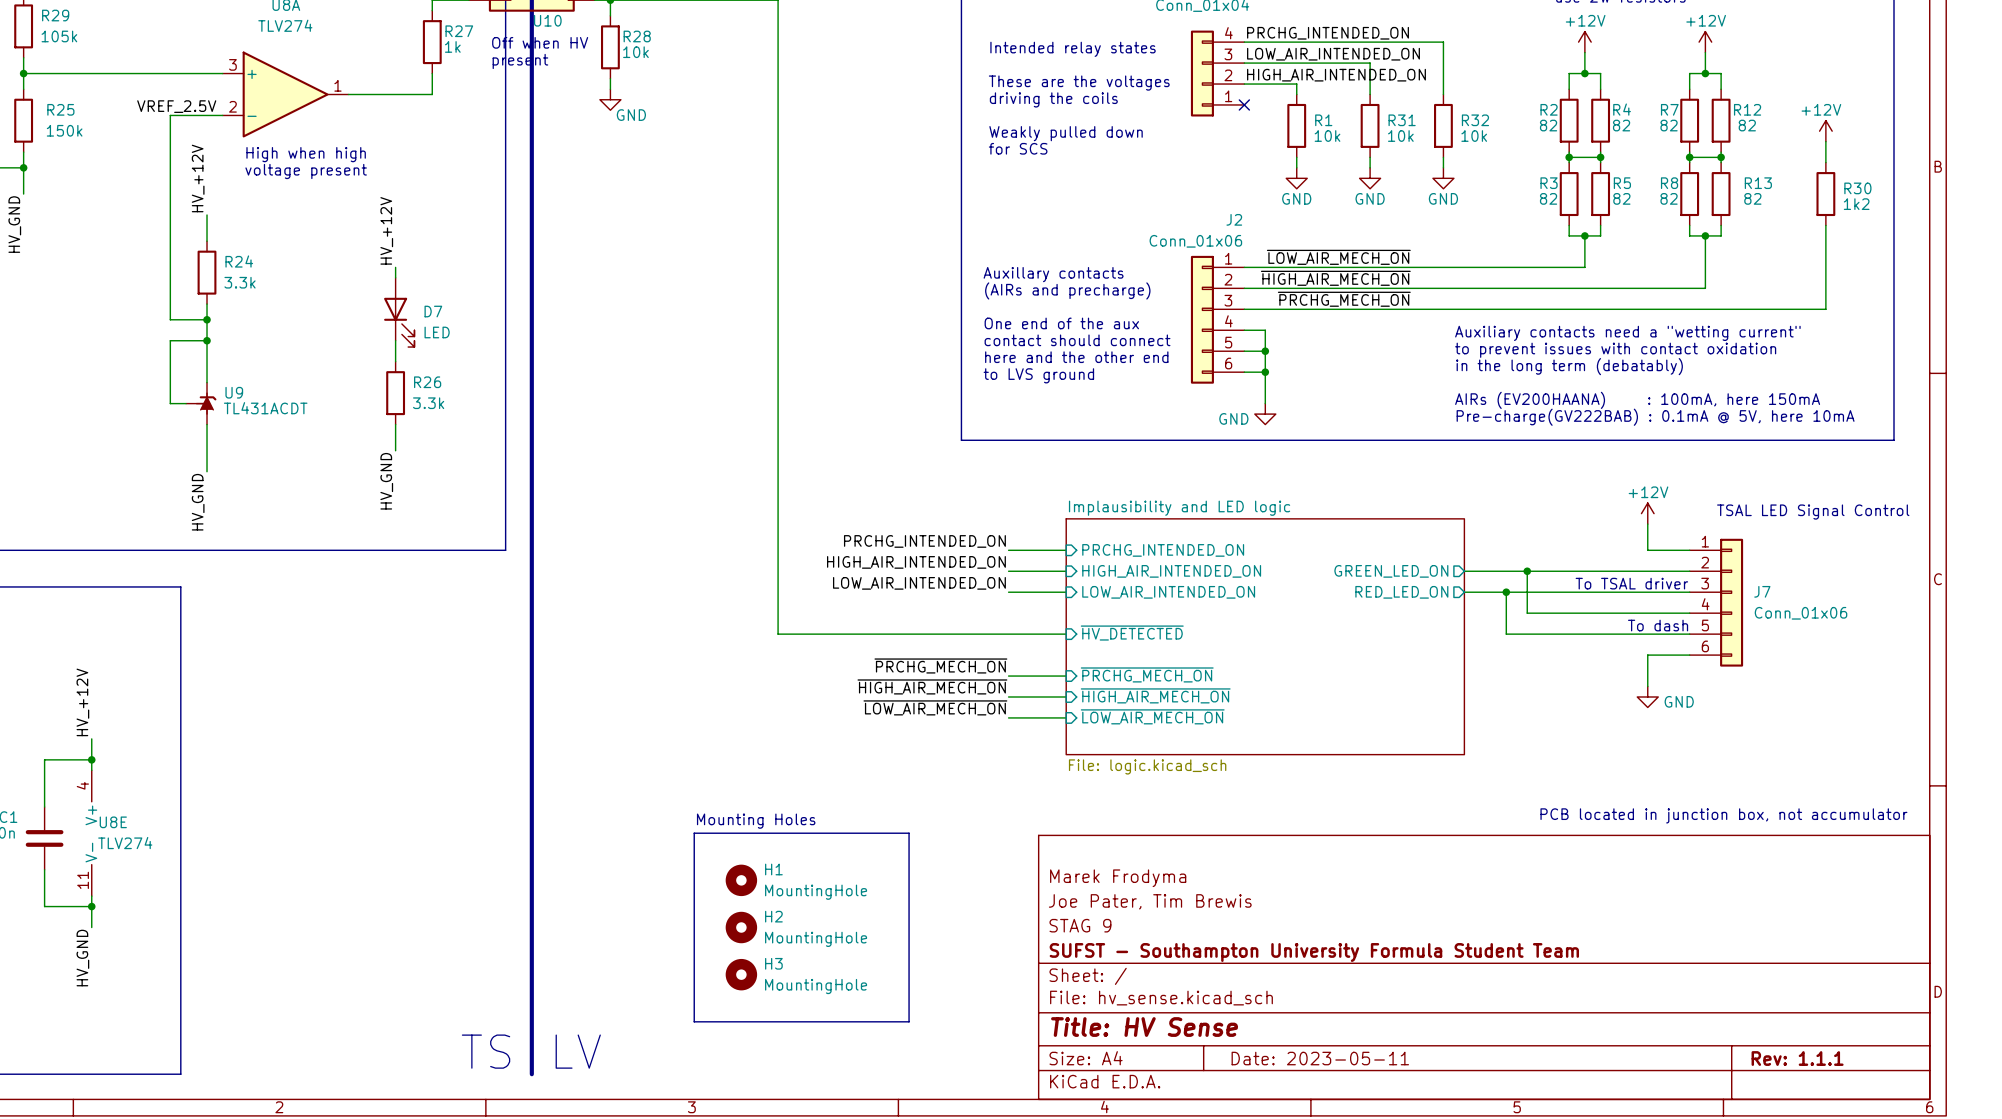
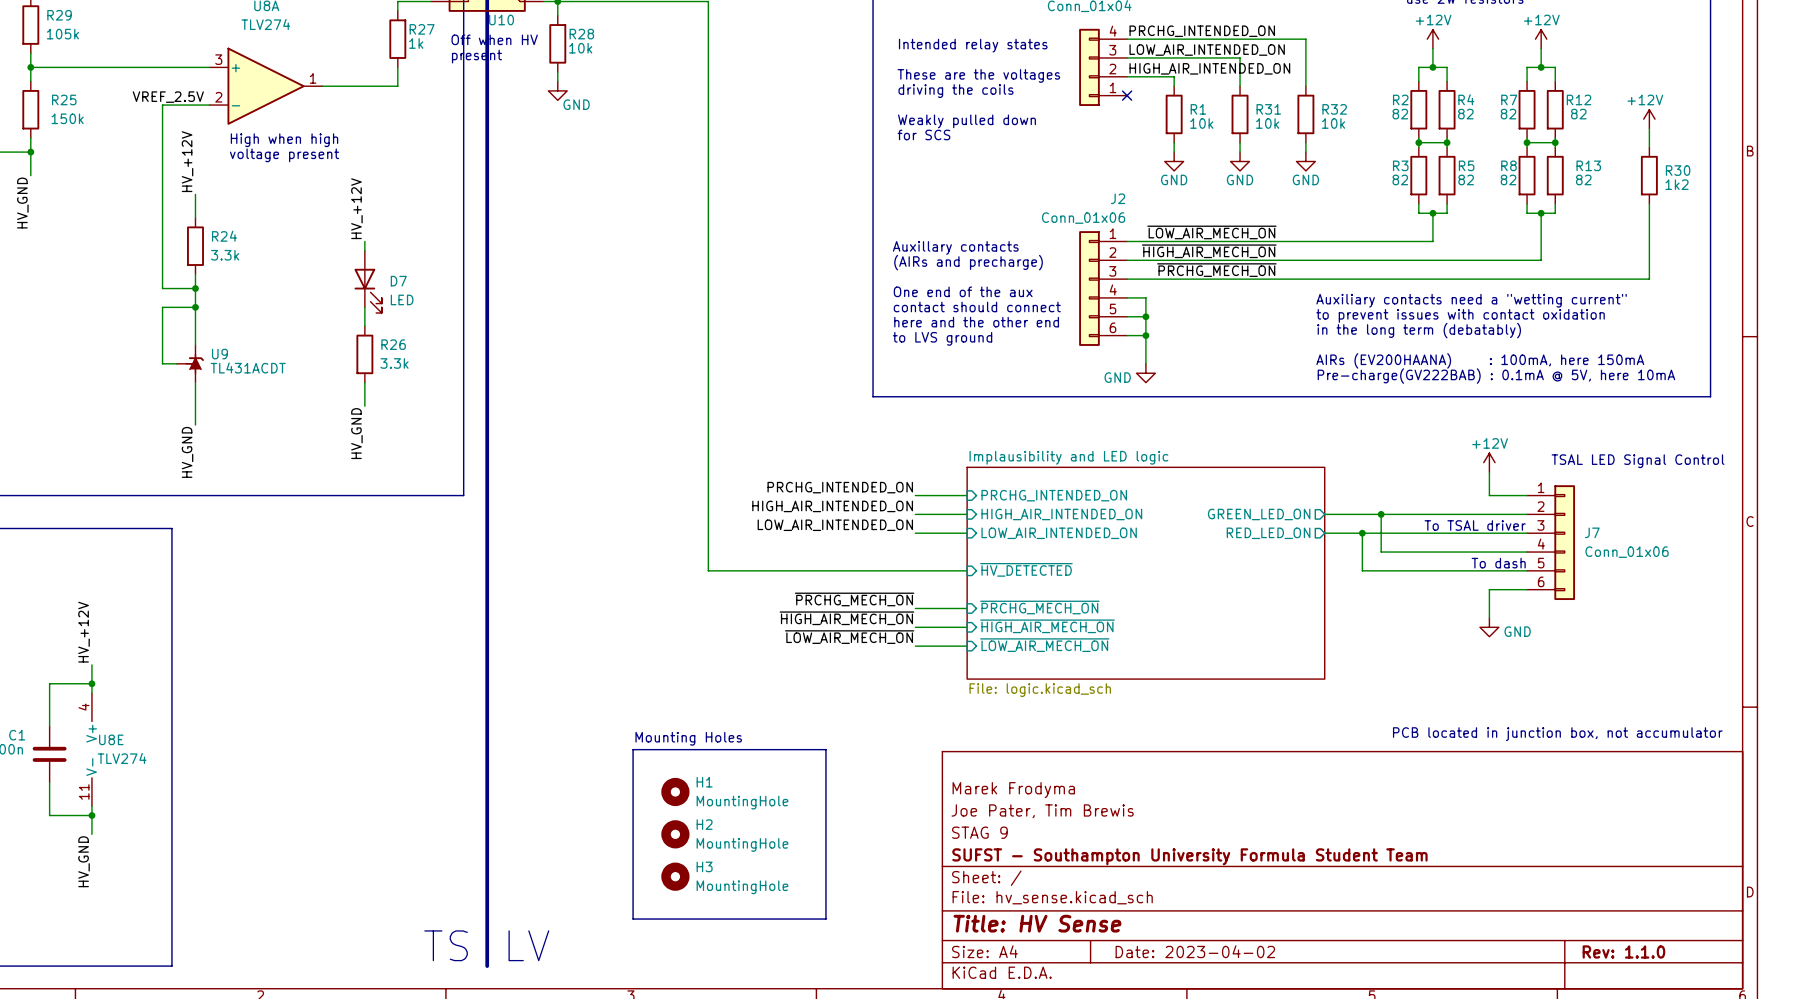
title block: Date: 2023-05-11 (1320, 1058) -> Date: 2023-04-02 (1195, 951)
title block: Rev: 1.1.1 (1797, 1058) -> Rev: 1.1.0 (1623, 951)

